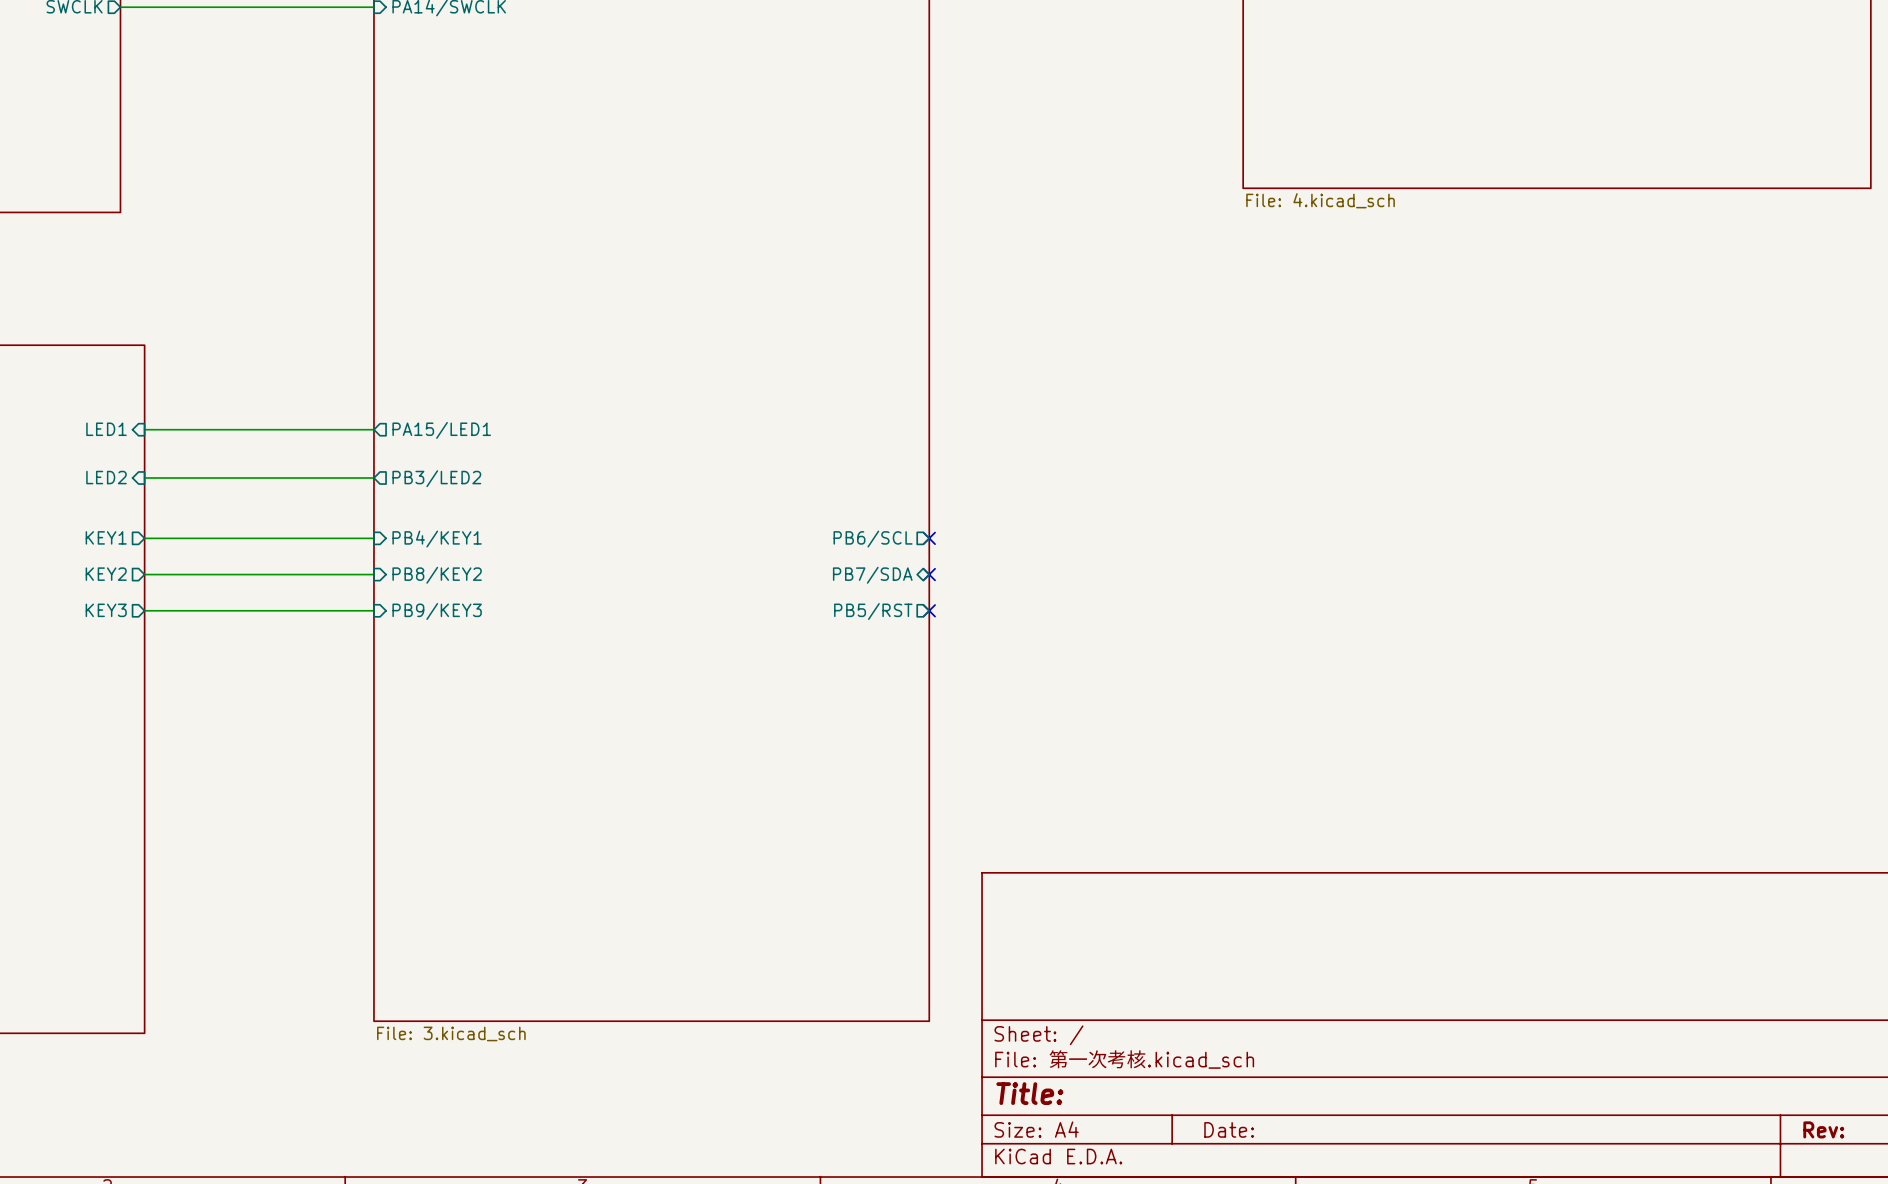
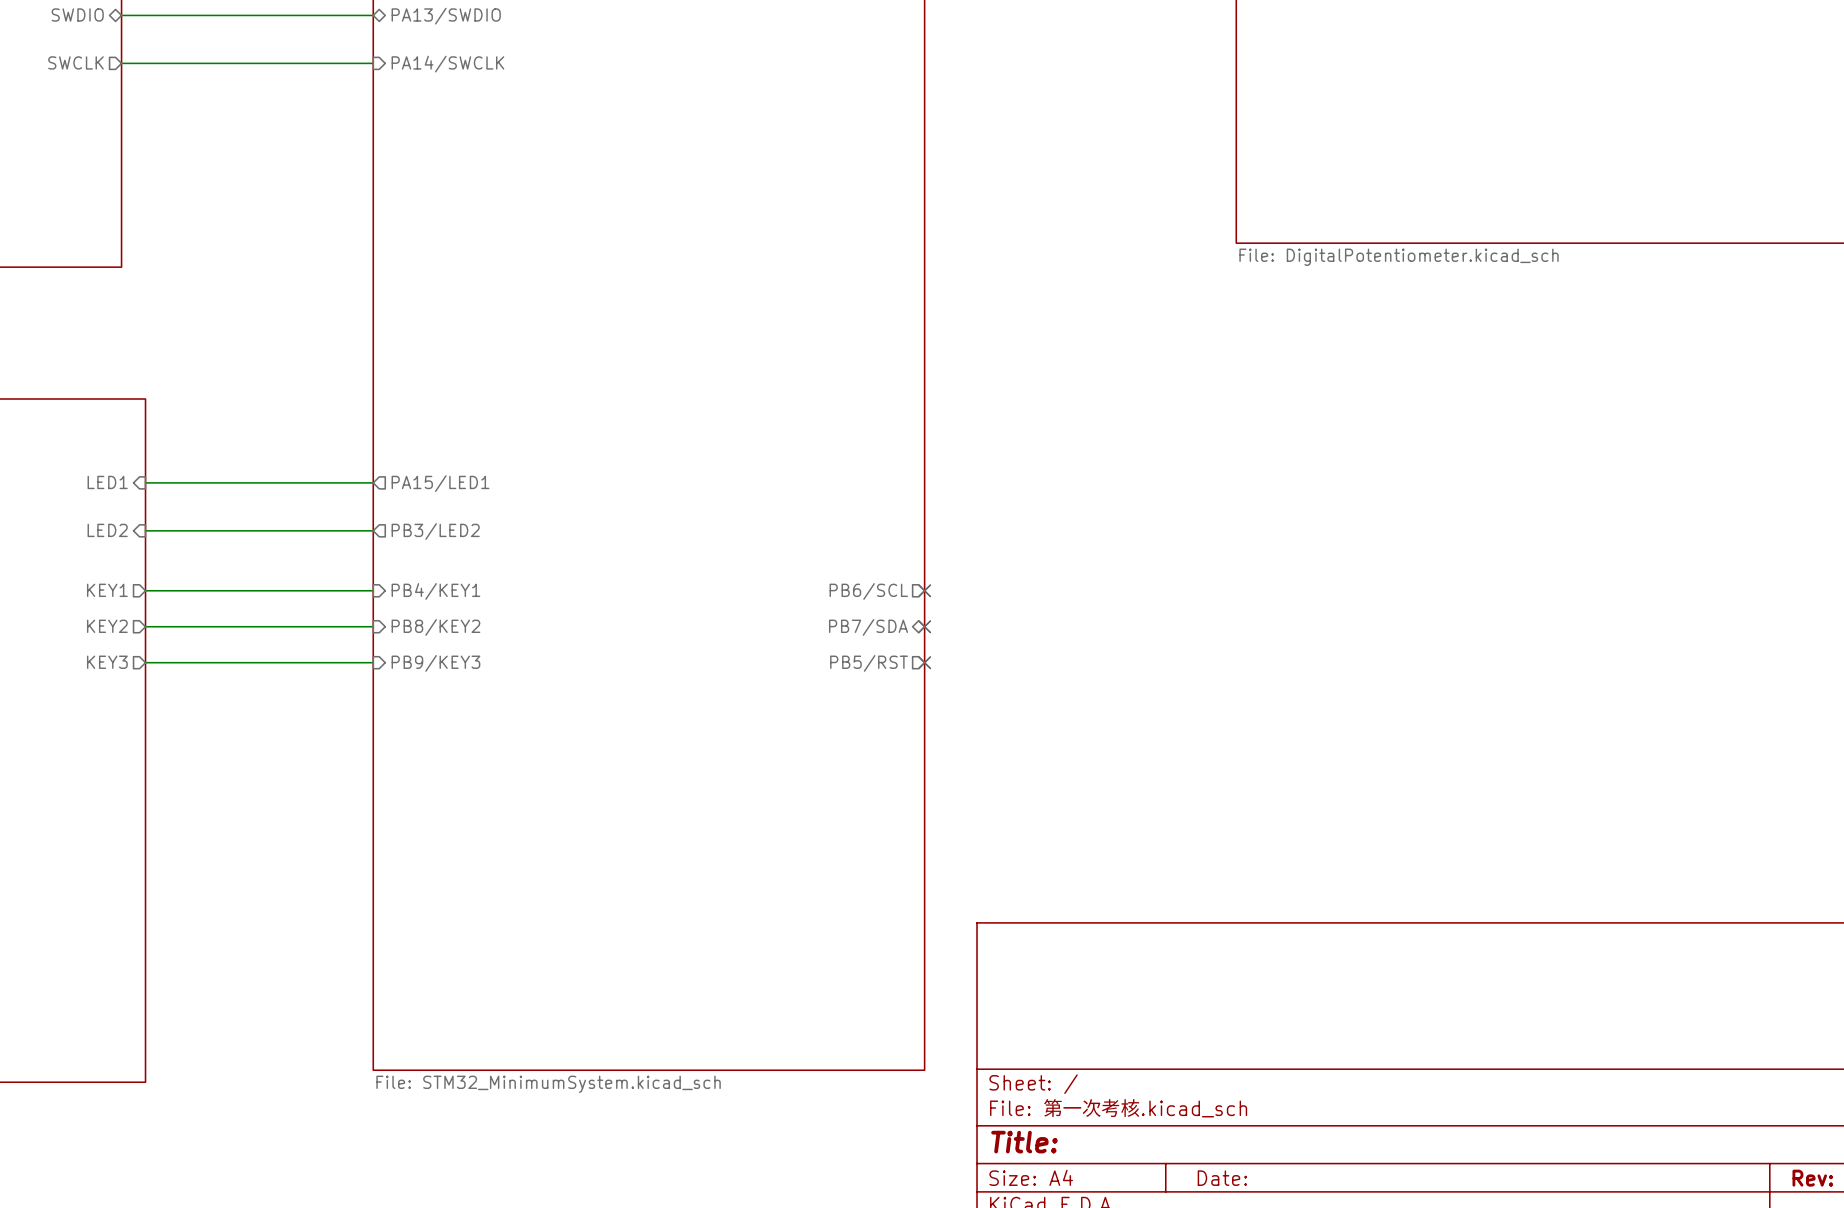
sheet value: File: 4.kicad_sch (1320, 200) -> File: DigitalPotentiometer.kicad_sch (1399, 257)
sheet value: File: 3.kicad_sch (451, 1033) -> File: STM32_MinimumSystem.kicad_sch (548, 1084)

